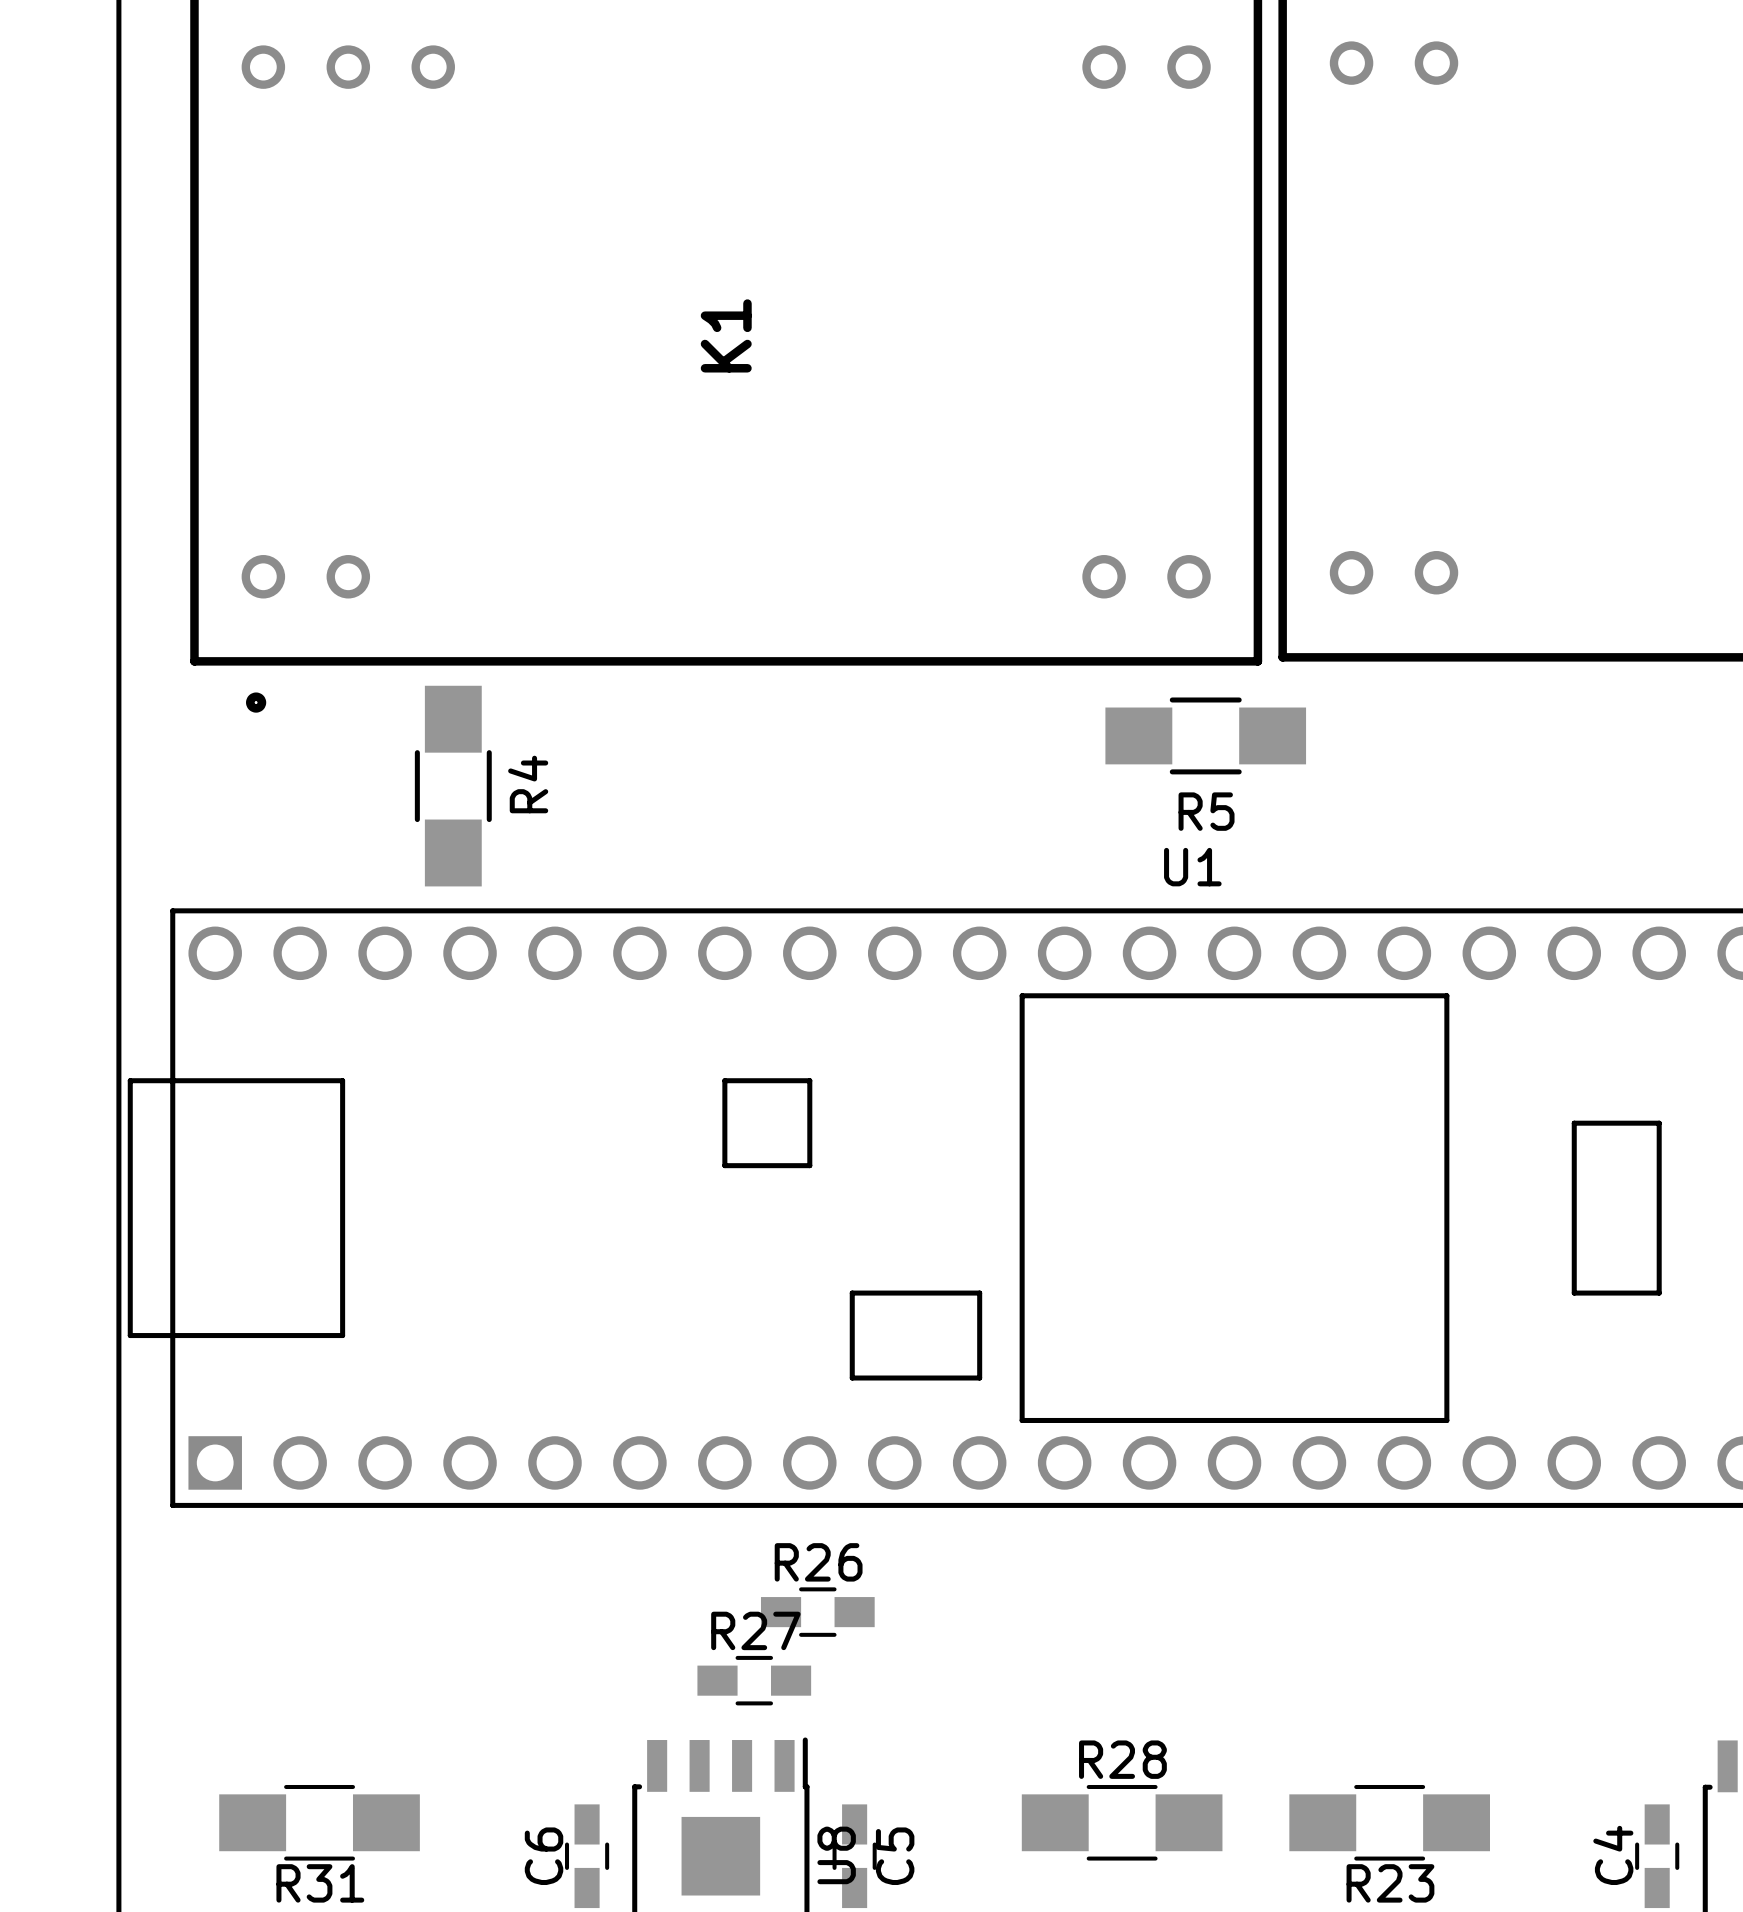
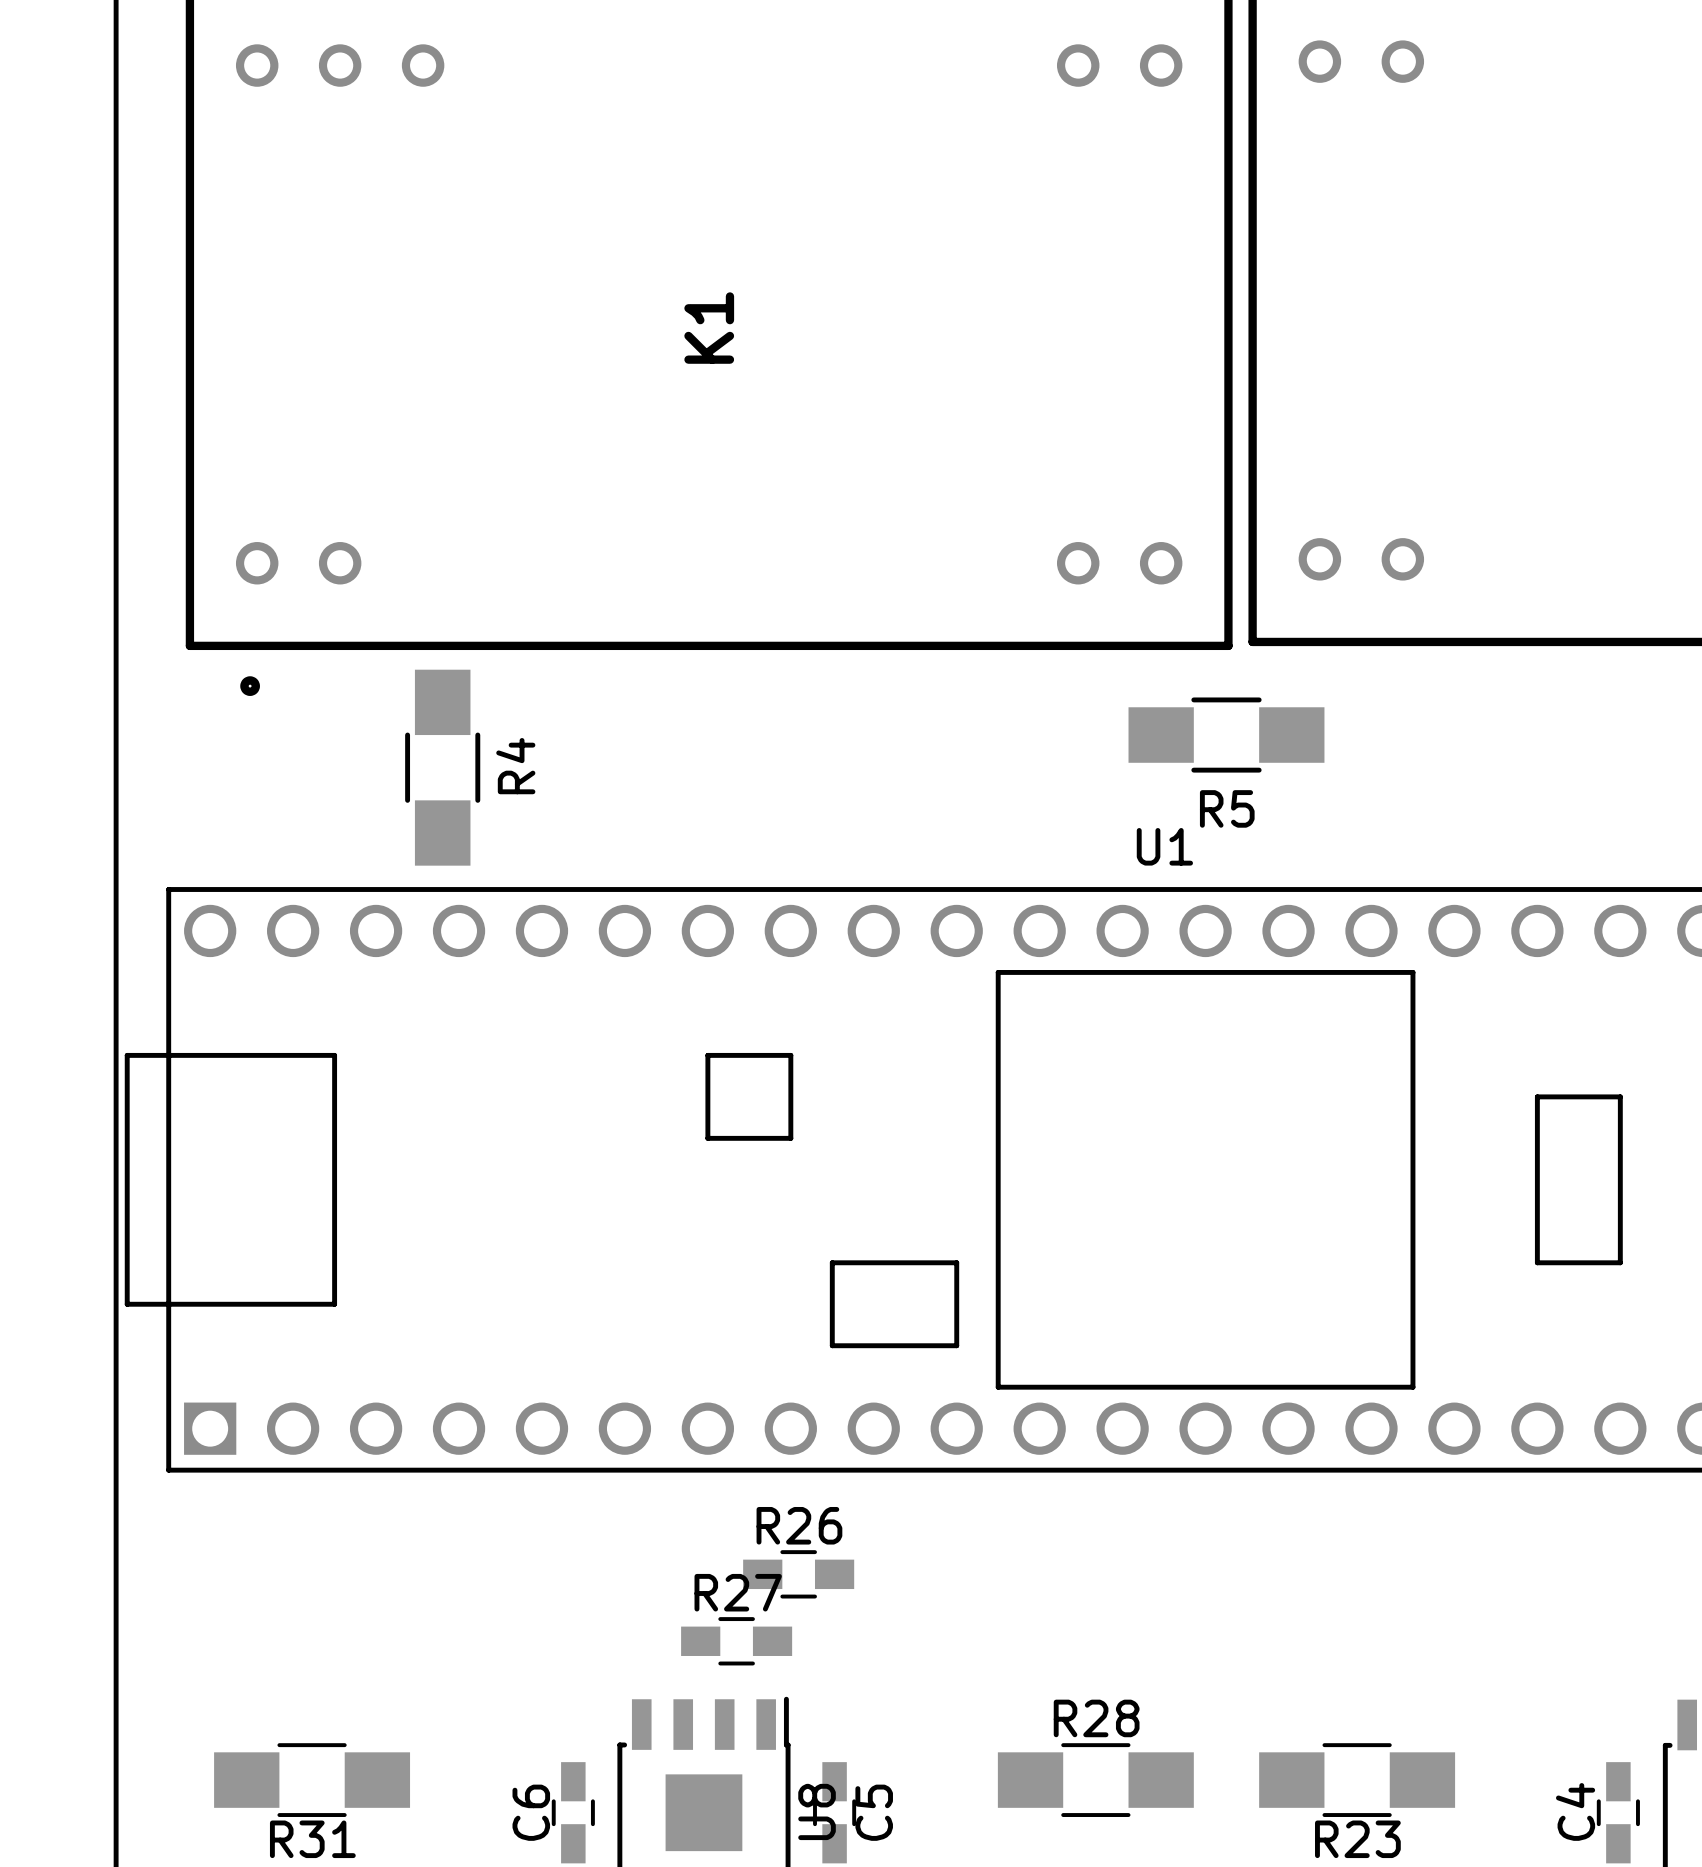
R5 position: (1205, 735) -> (1226, 735)

